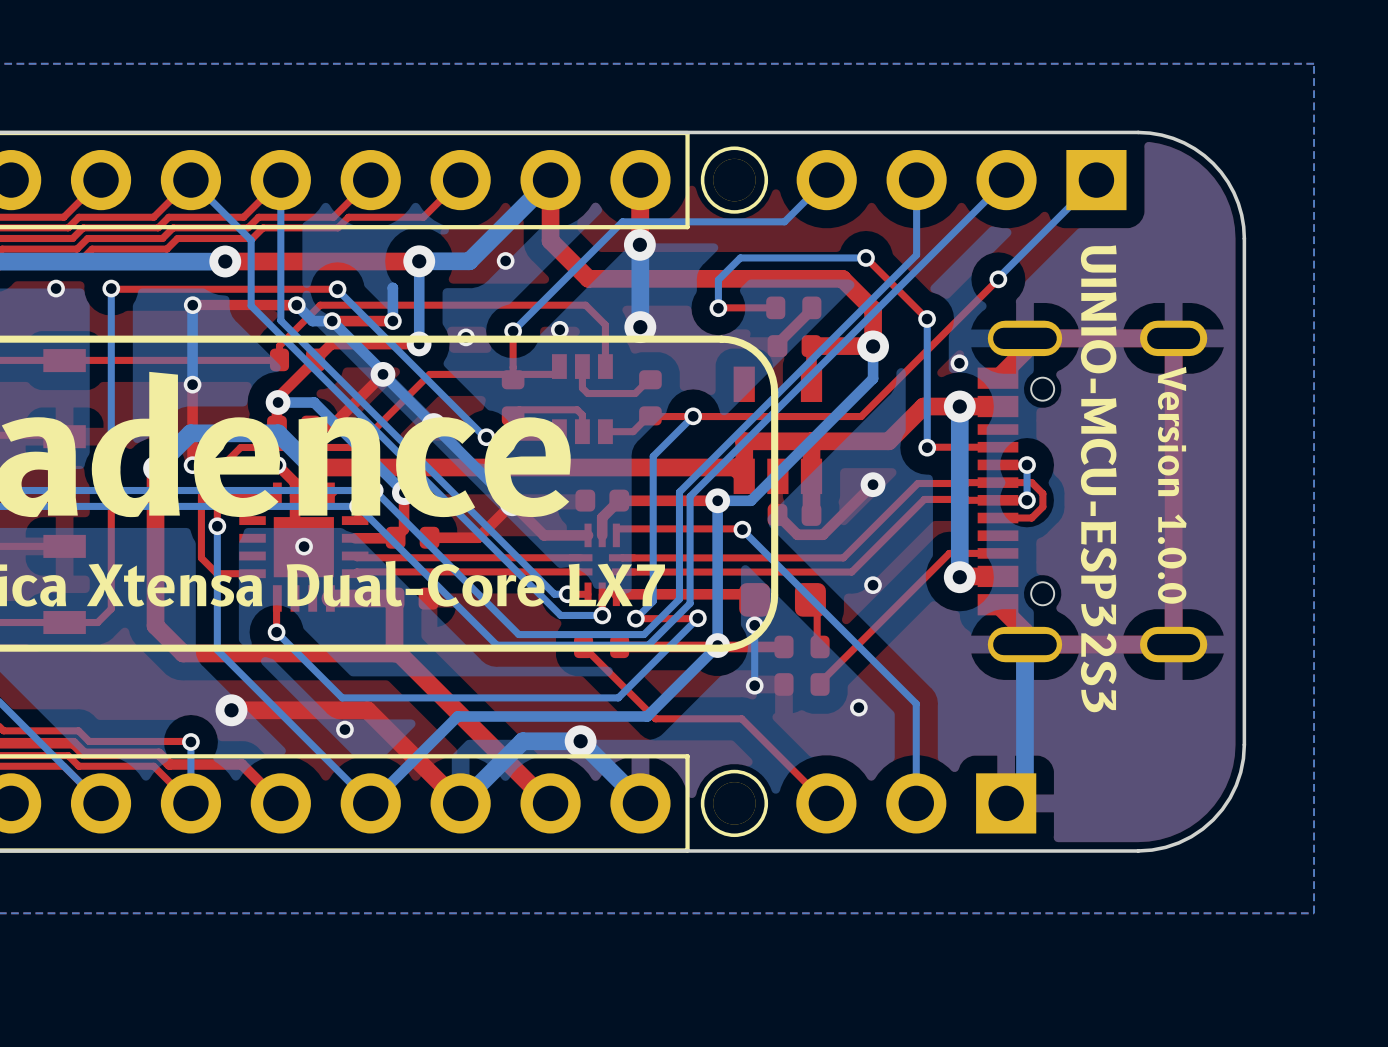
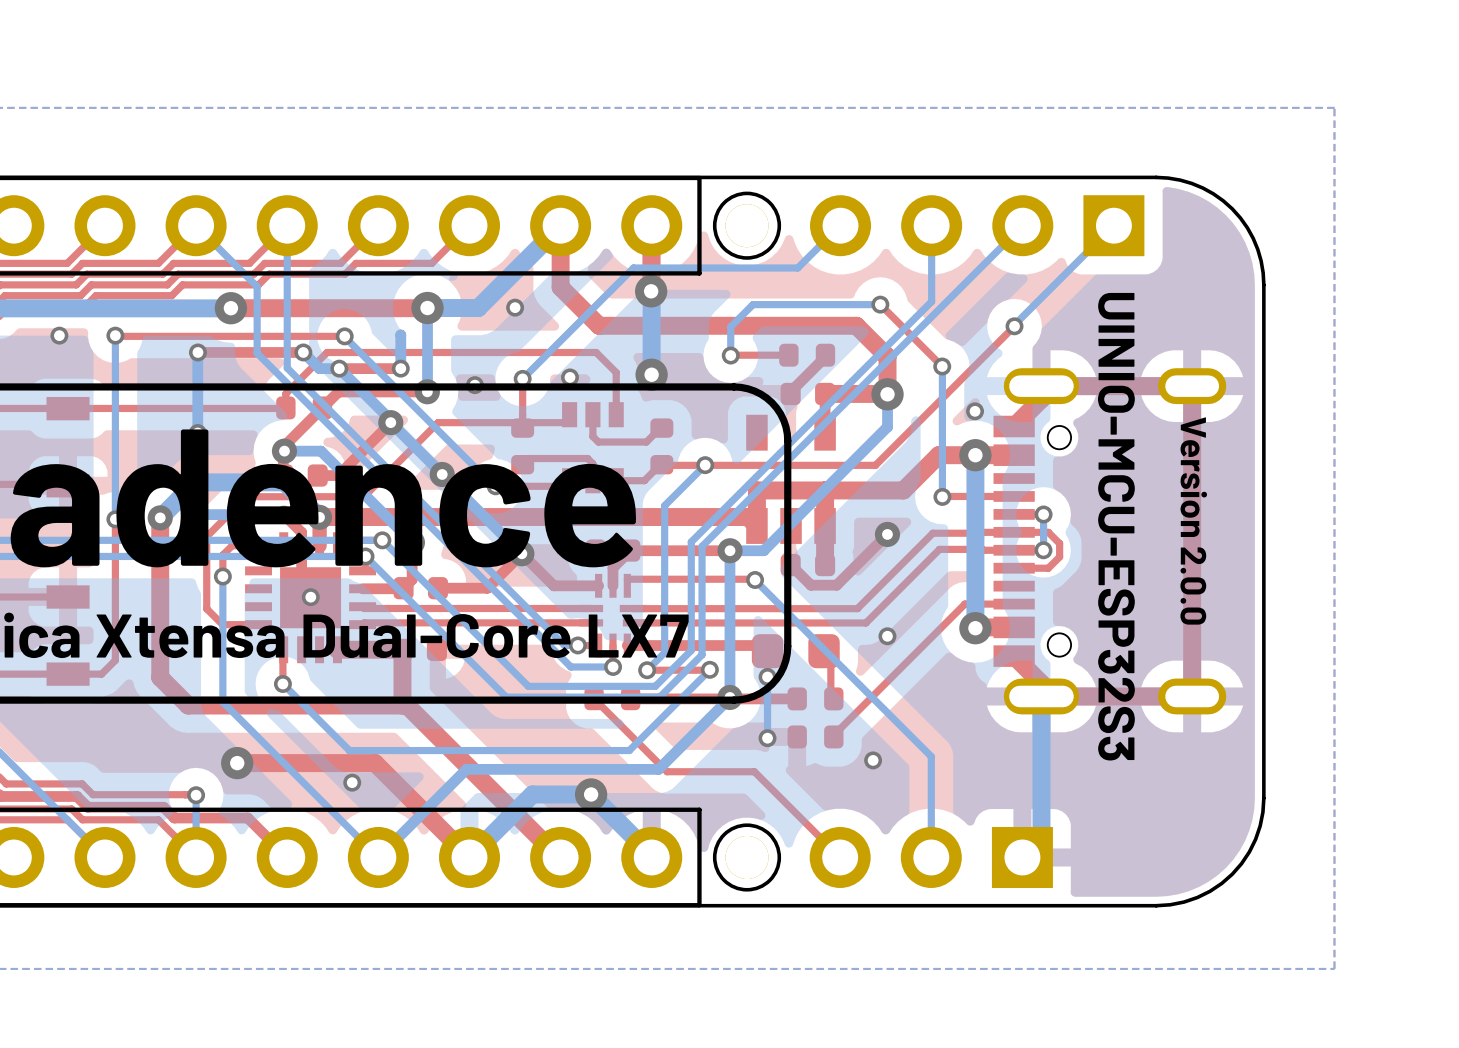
text: Version 1.0.0 (1172, 485) -> Version 2.0.0 (1193, 520)

